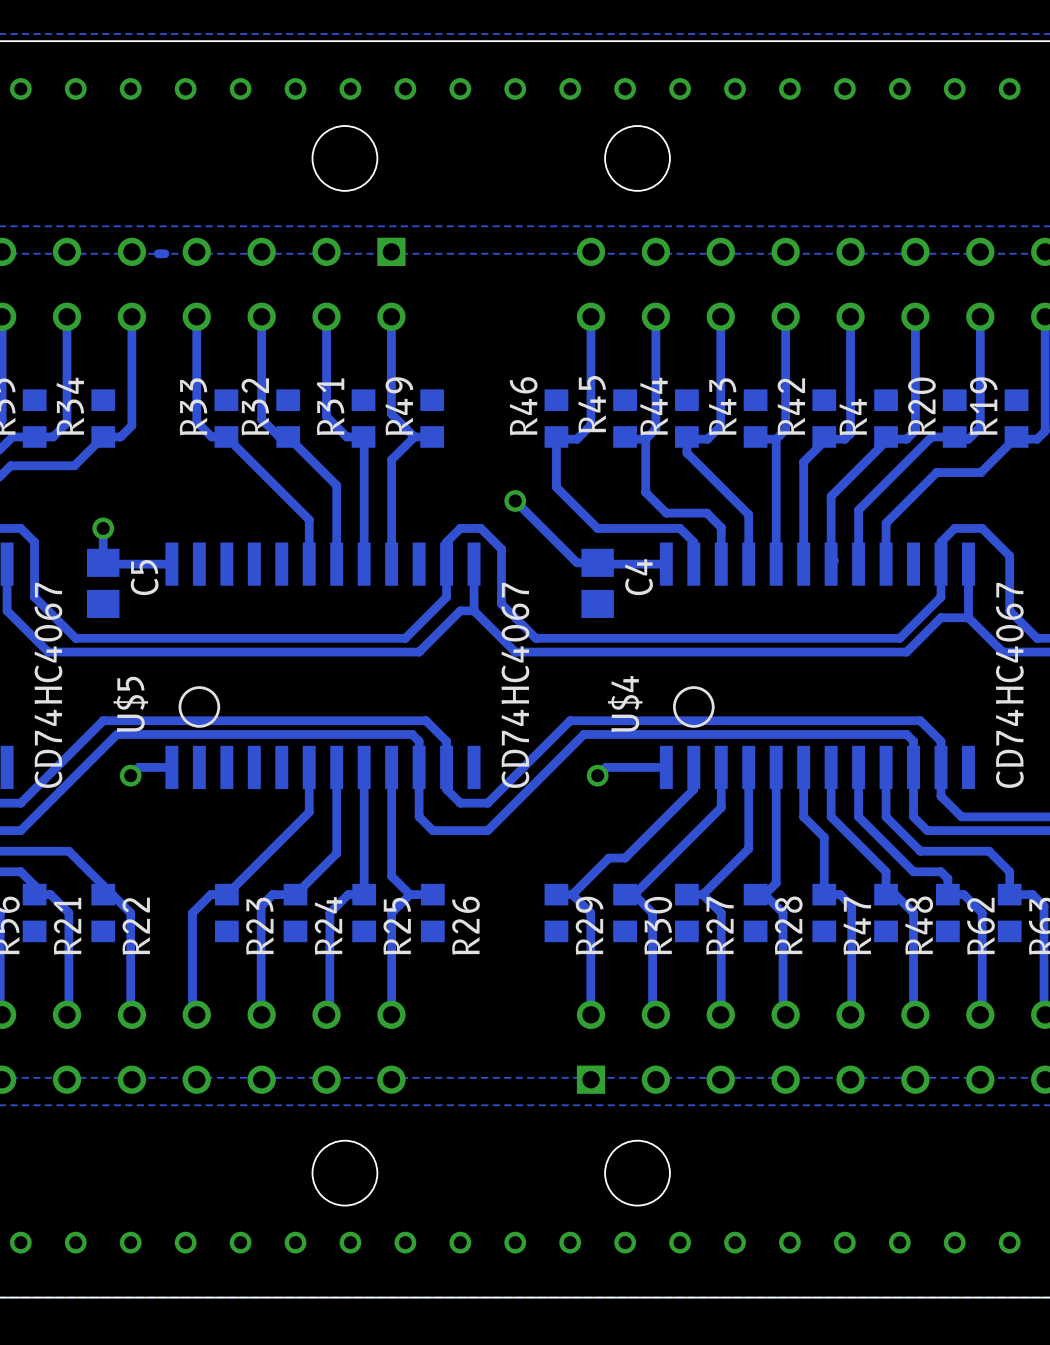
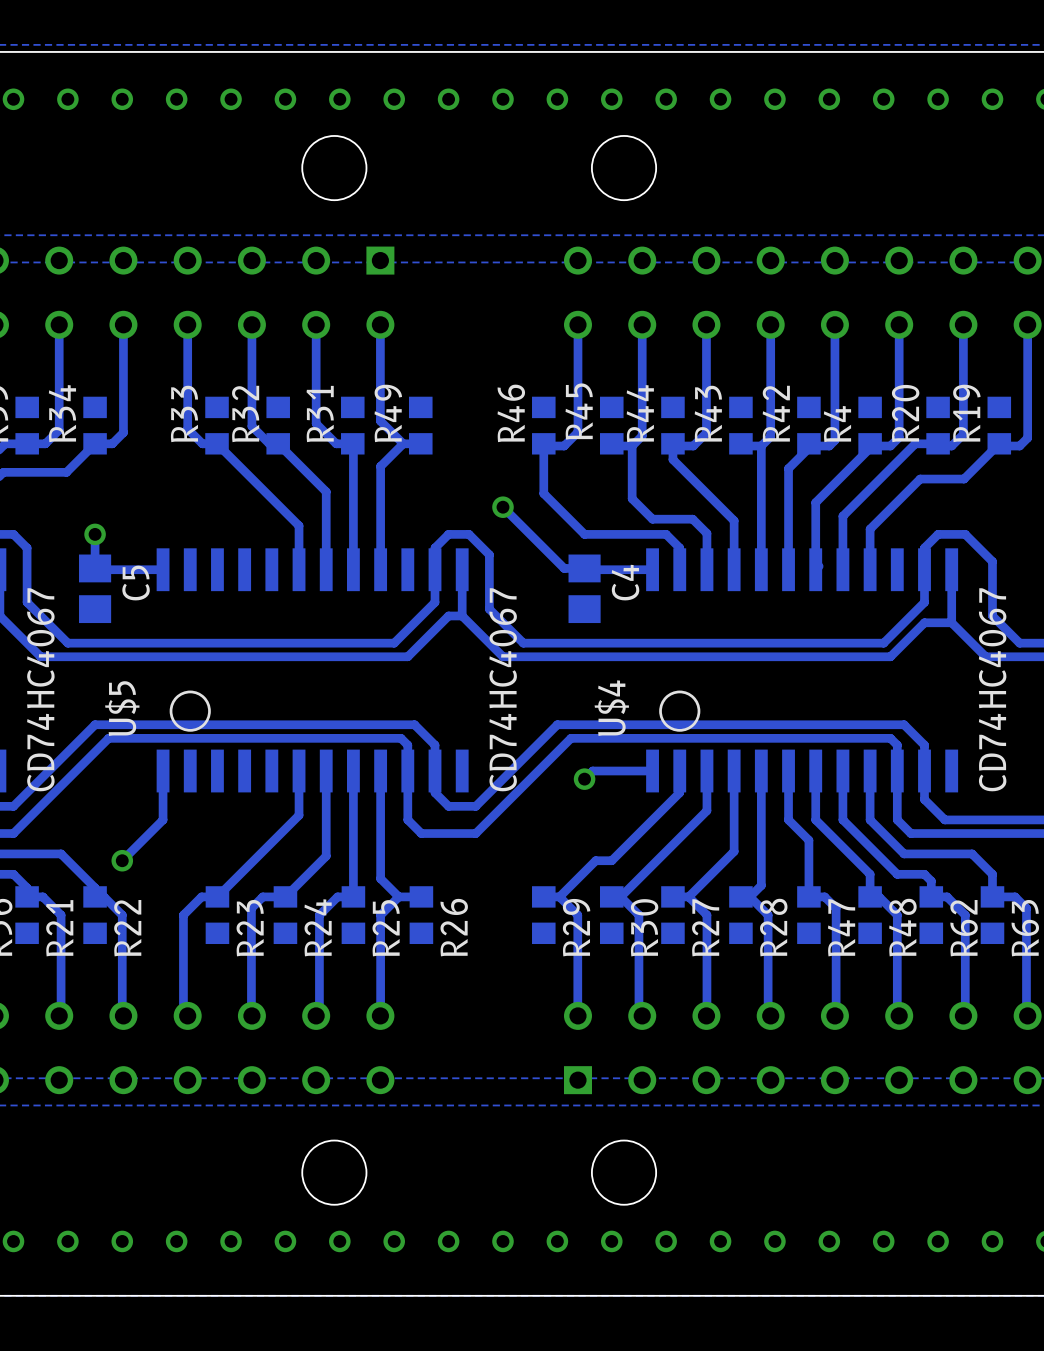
track: (165, 253) (158, 253) -> none
track: (171, 767) (138, 767) (130, 775) -> (163, 771) (163, 819) (122, 860)
via position: (130, 775) -> (122, 860)

